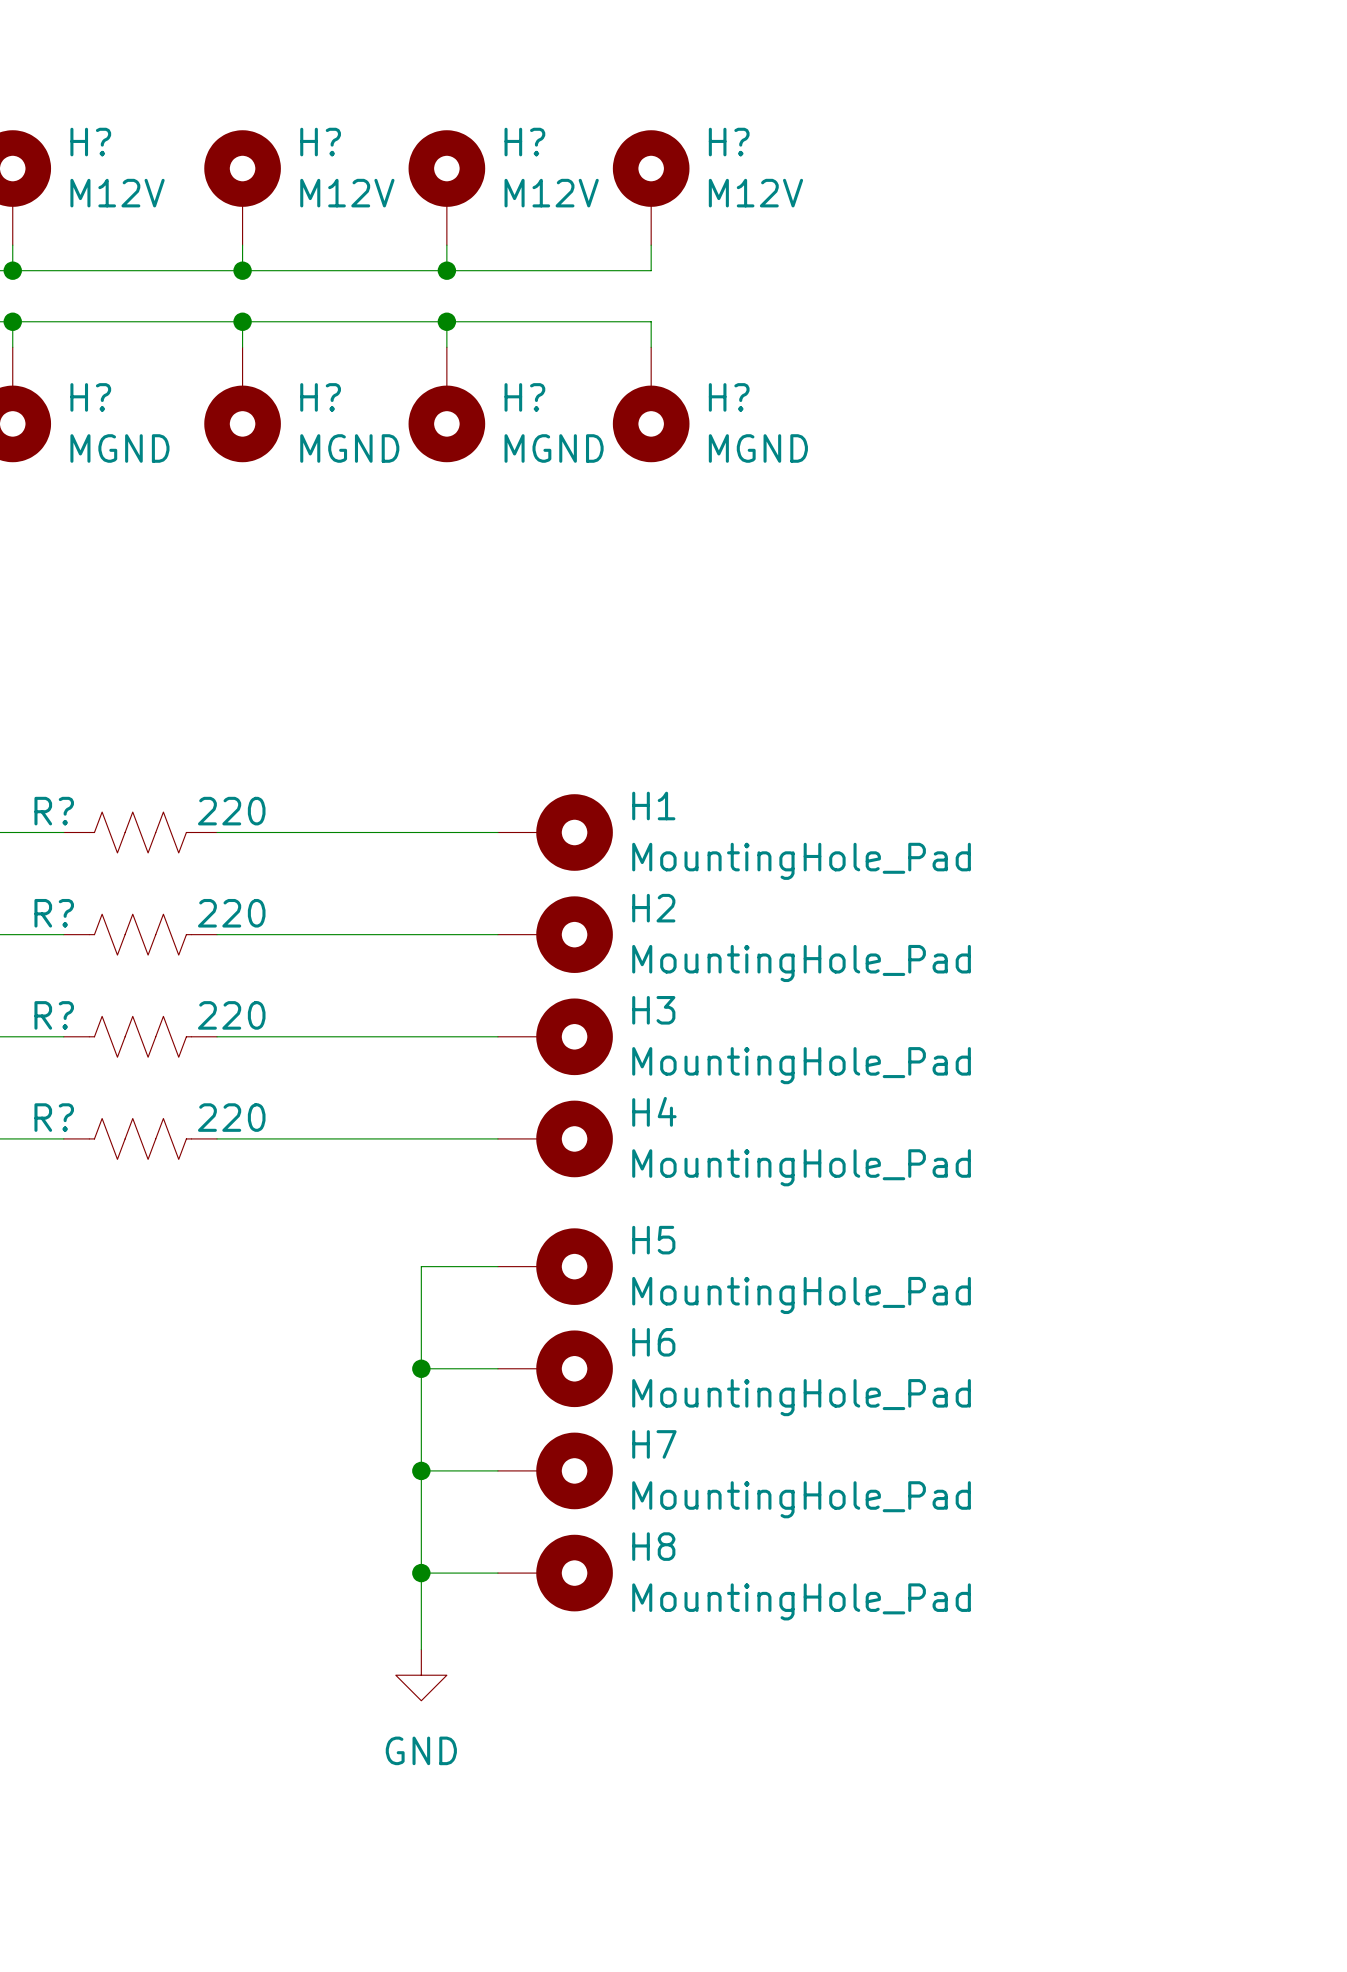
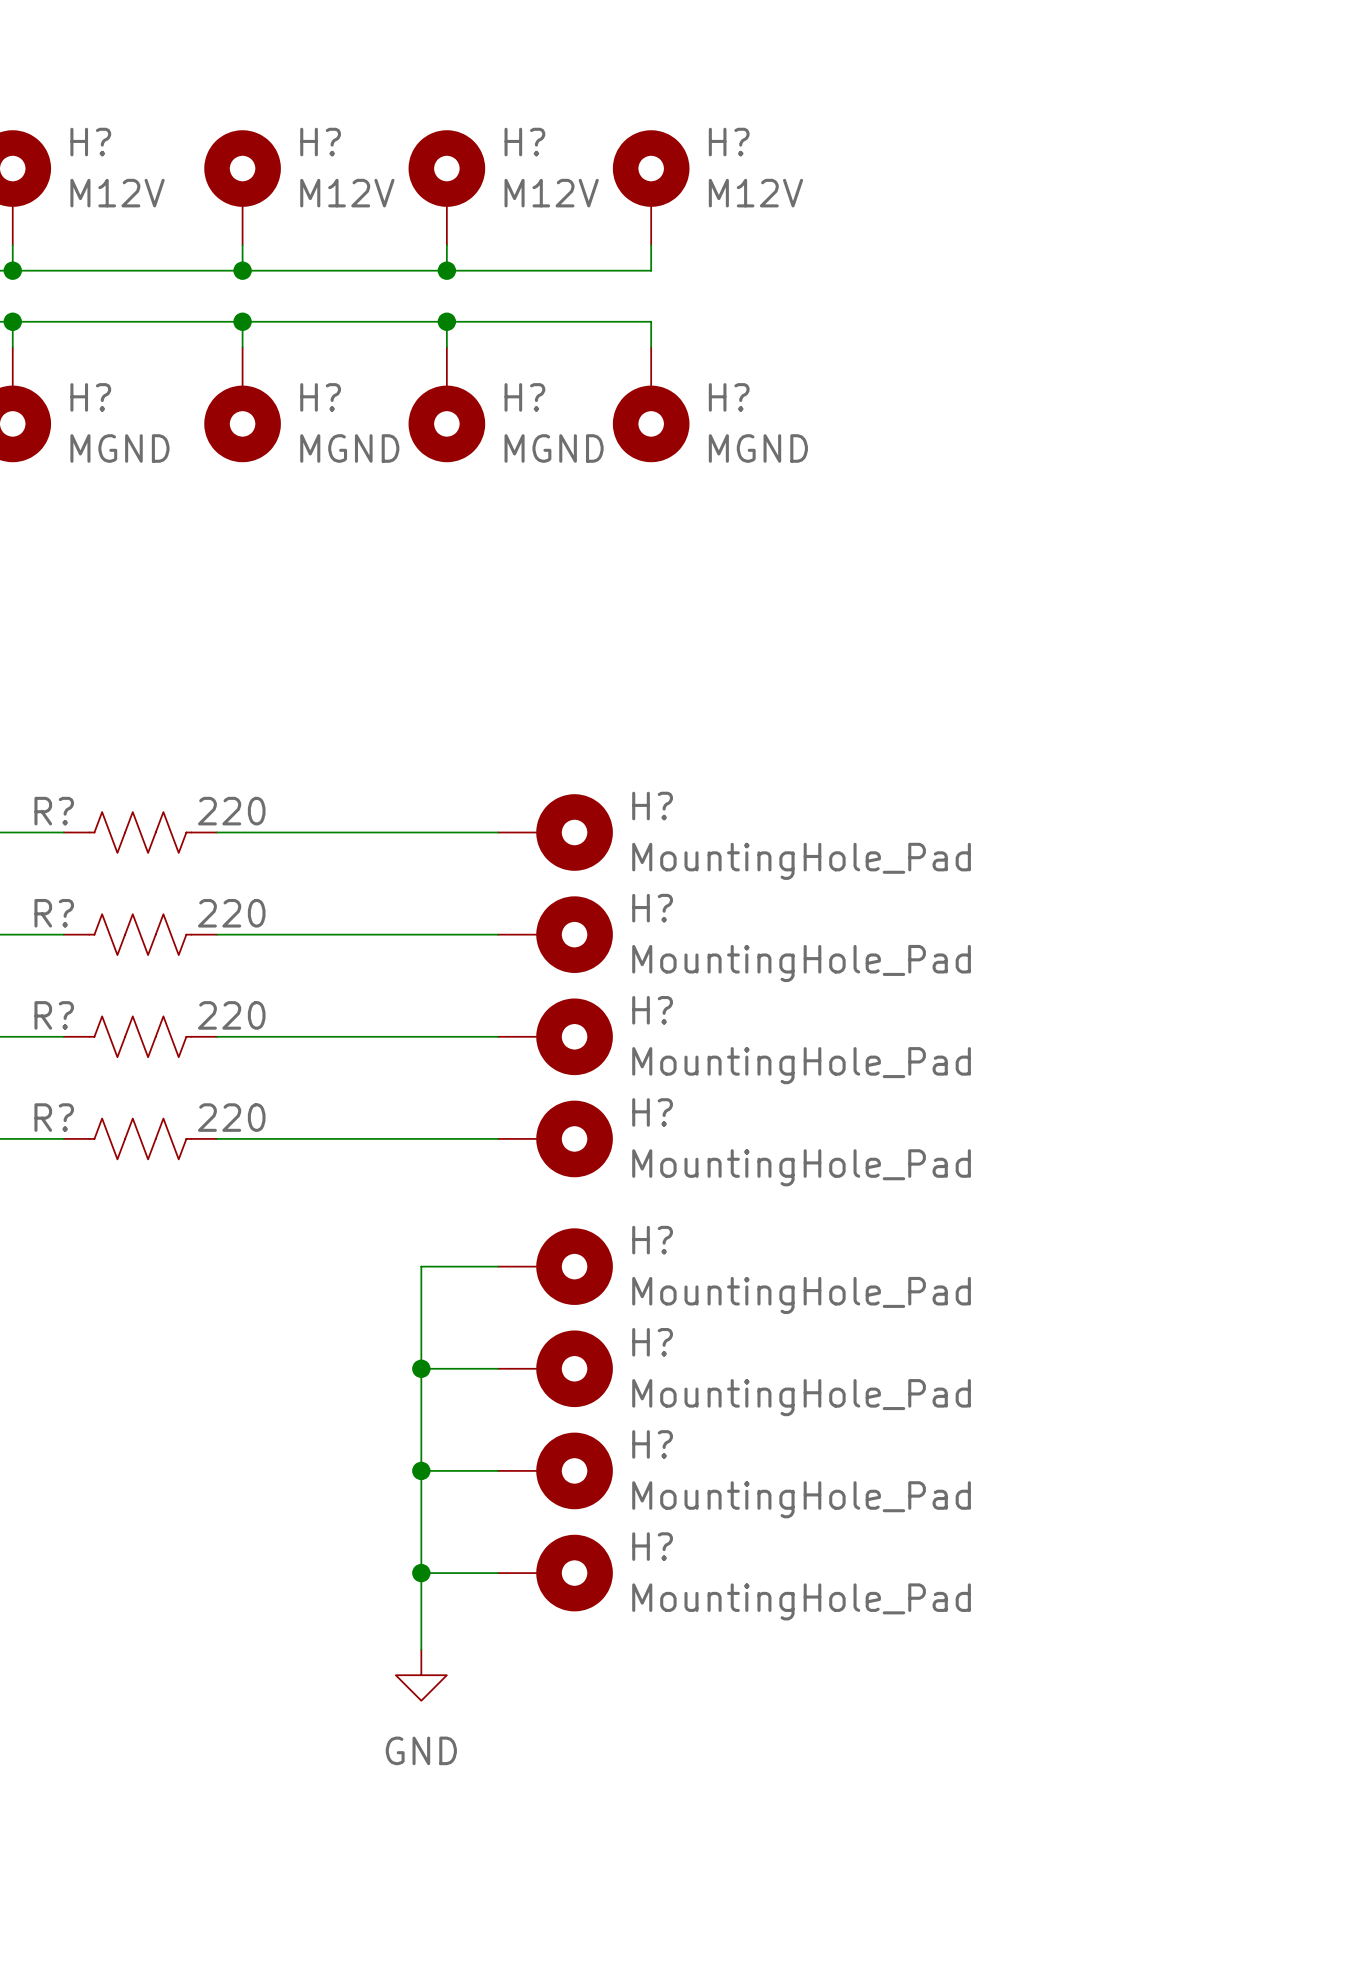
H1 name: H1 (653, 806) -> H? (652, 806)
H2 name: H2 (653, 908) -> H? (652, 908)
H3 name: H3 (653, 1010) -> H? (652, 1010)
H4 name: H4 (654, 1111) -> H? (652, 1112)
H5 name: H5 (653, 1240) -> H? (652, 1240)
H6 name: H6 (653, 1342) -> H? (652, 1342)
H7 name: H7 (654, 1444) -> H? (652, 1444)
H8 name: H8 (653, 1546) -> H? (652, 1546)

